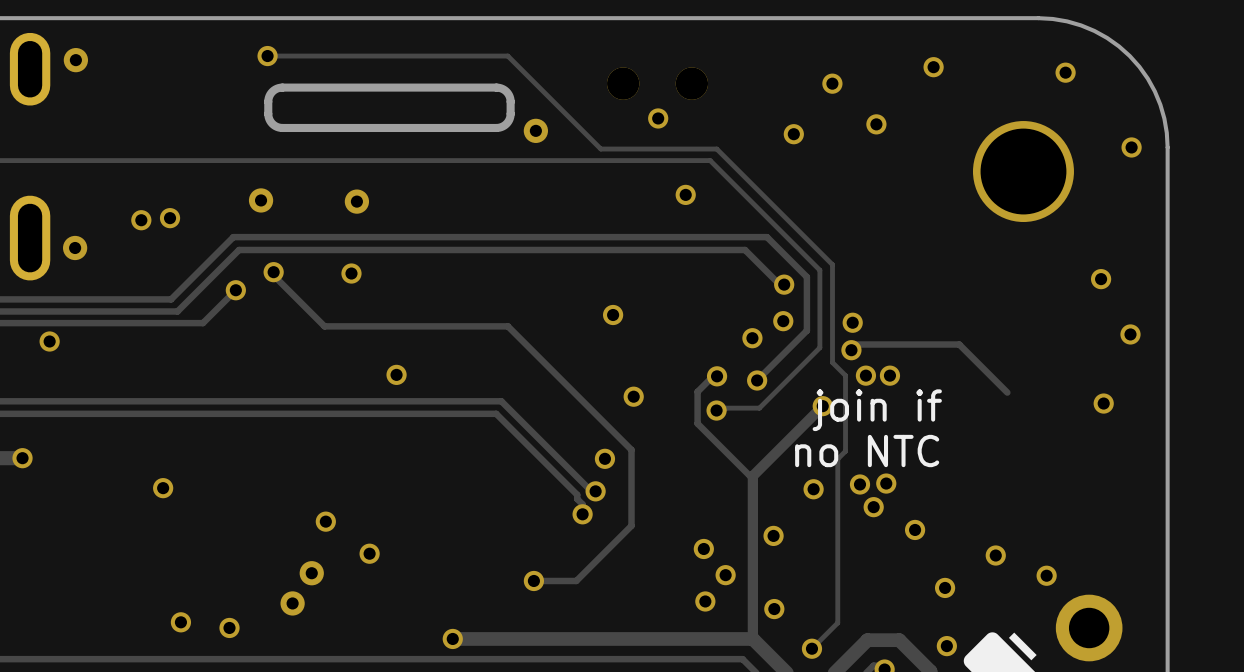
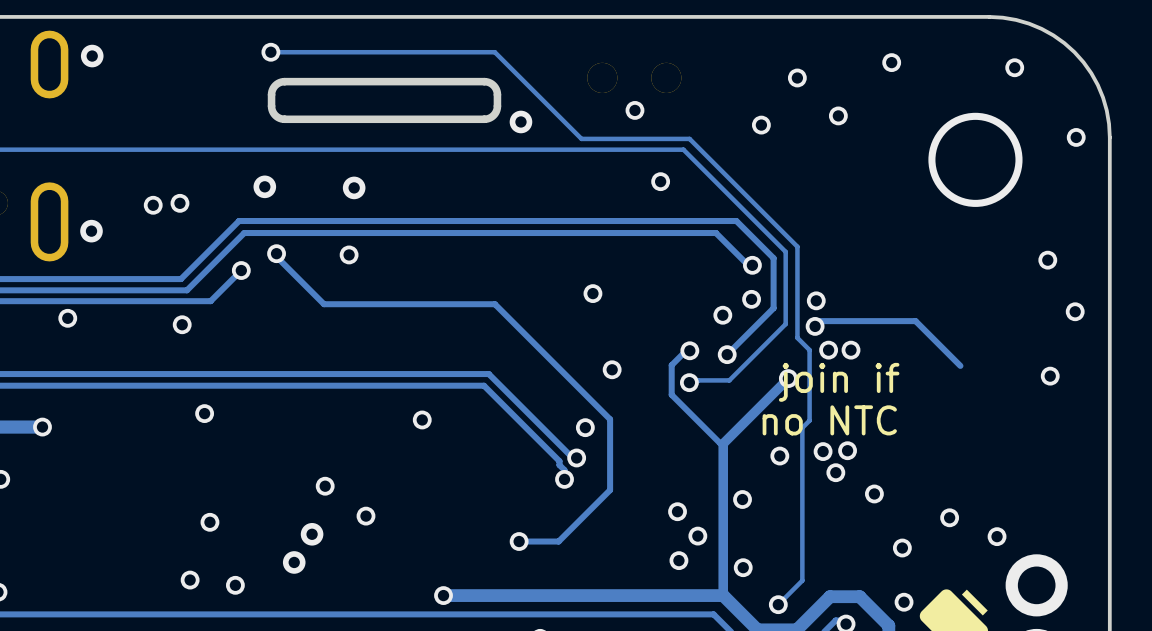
via: none -> (182, 324)
via position: (396, 374) -> (422, 419)
via: none -> (204, 413)
via: (163, 488) -> none
via: none -> (209, 522)

